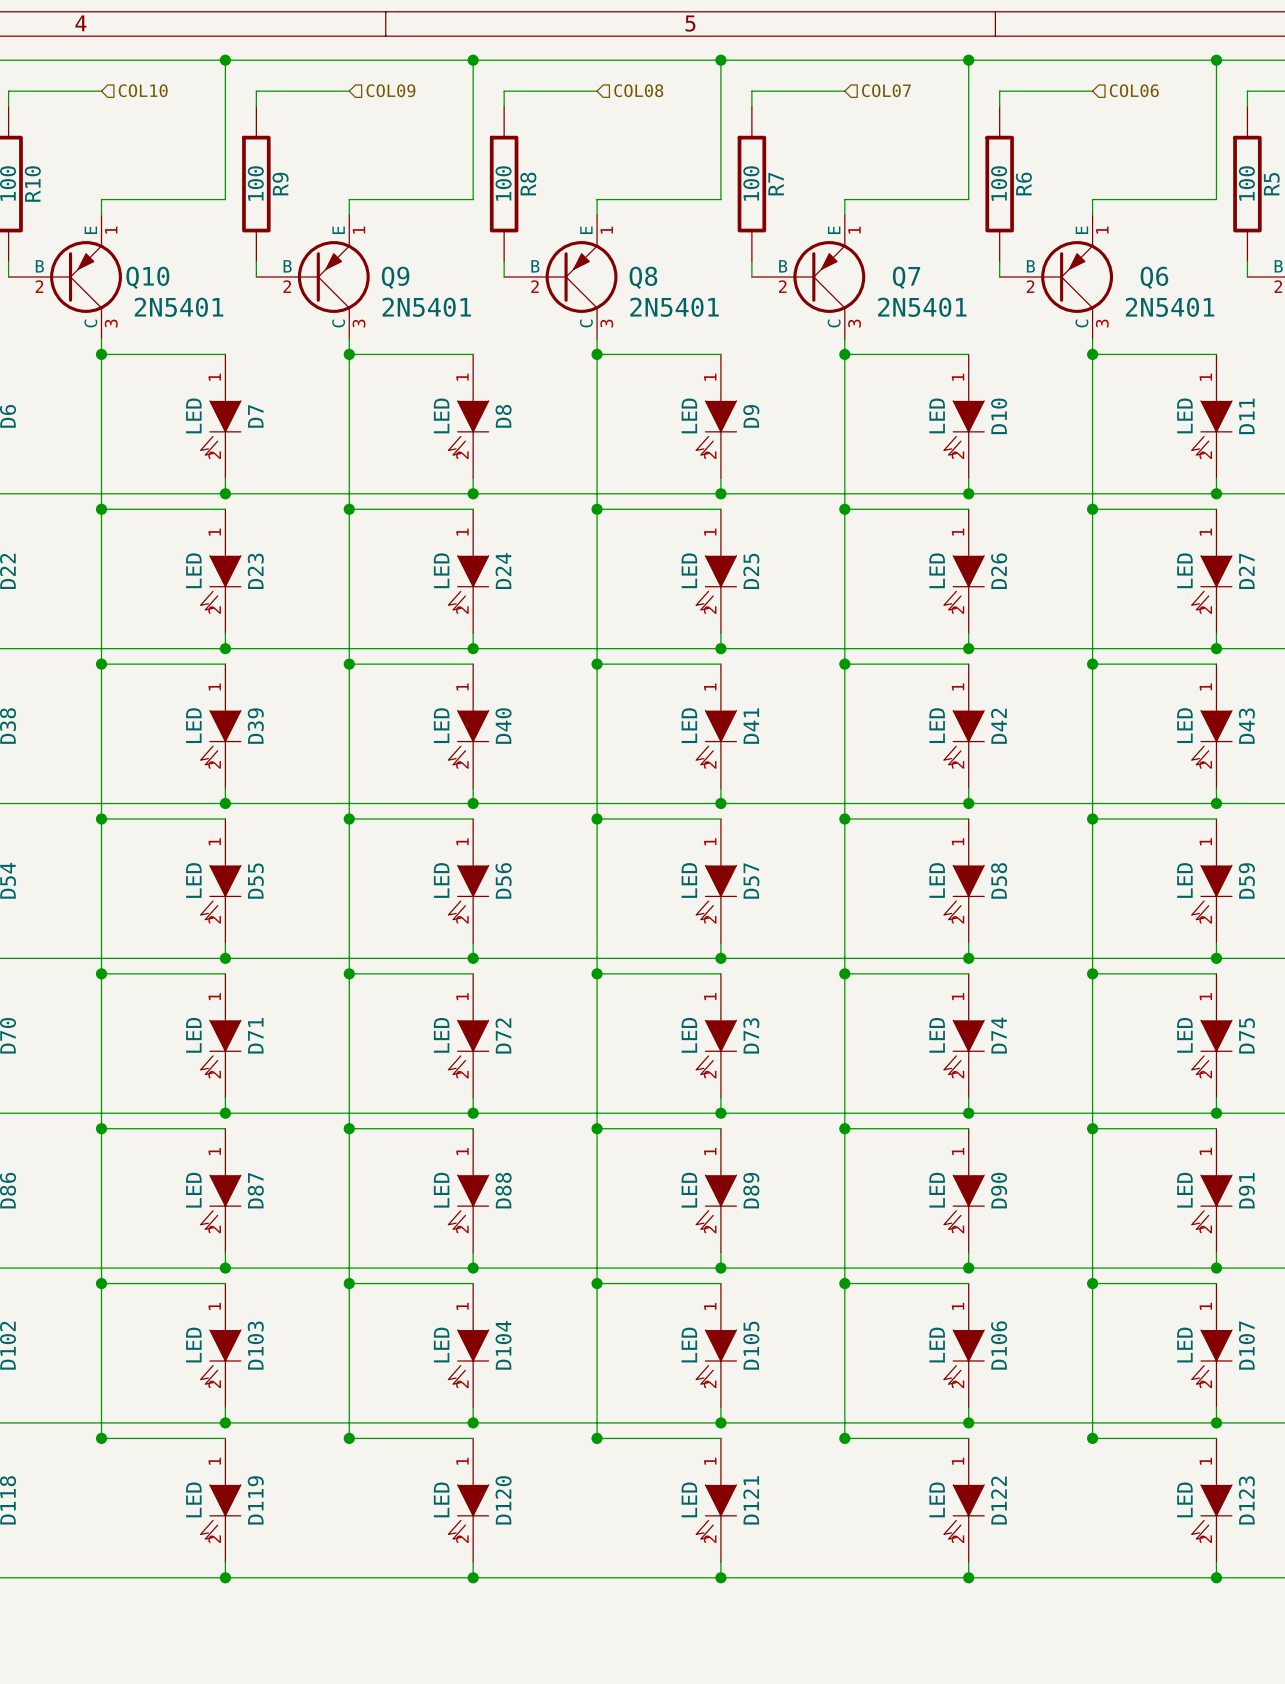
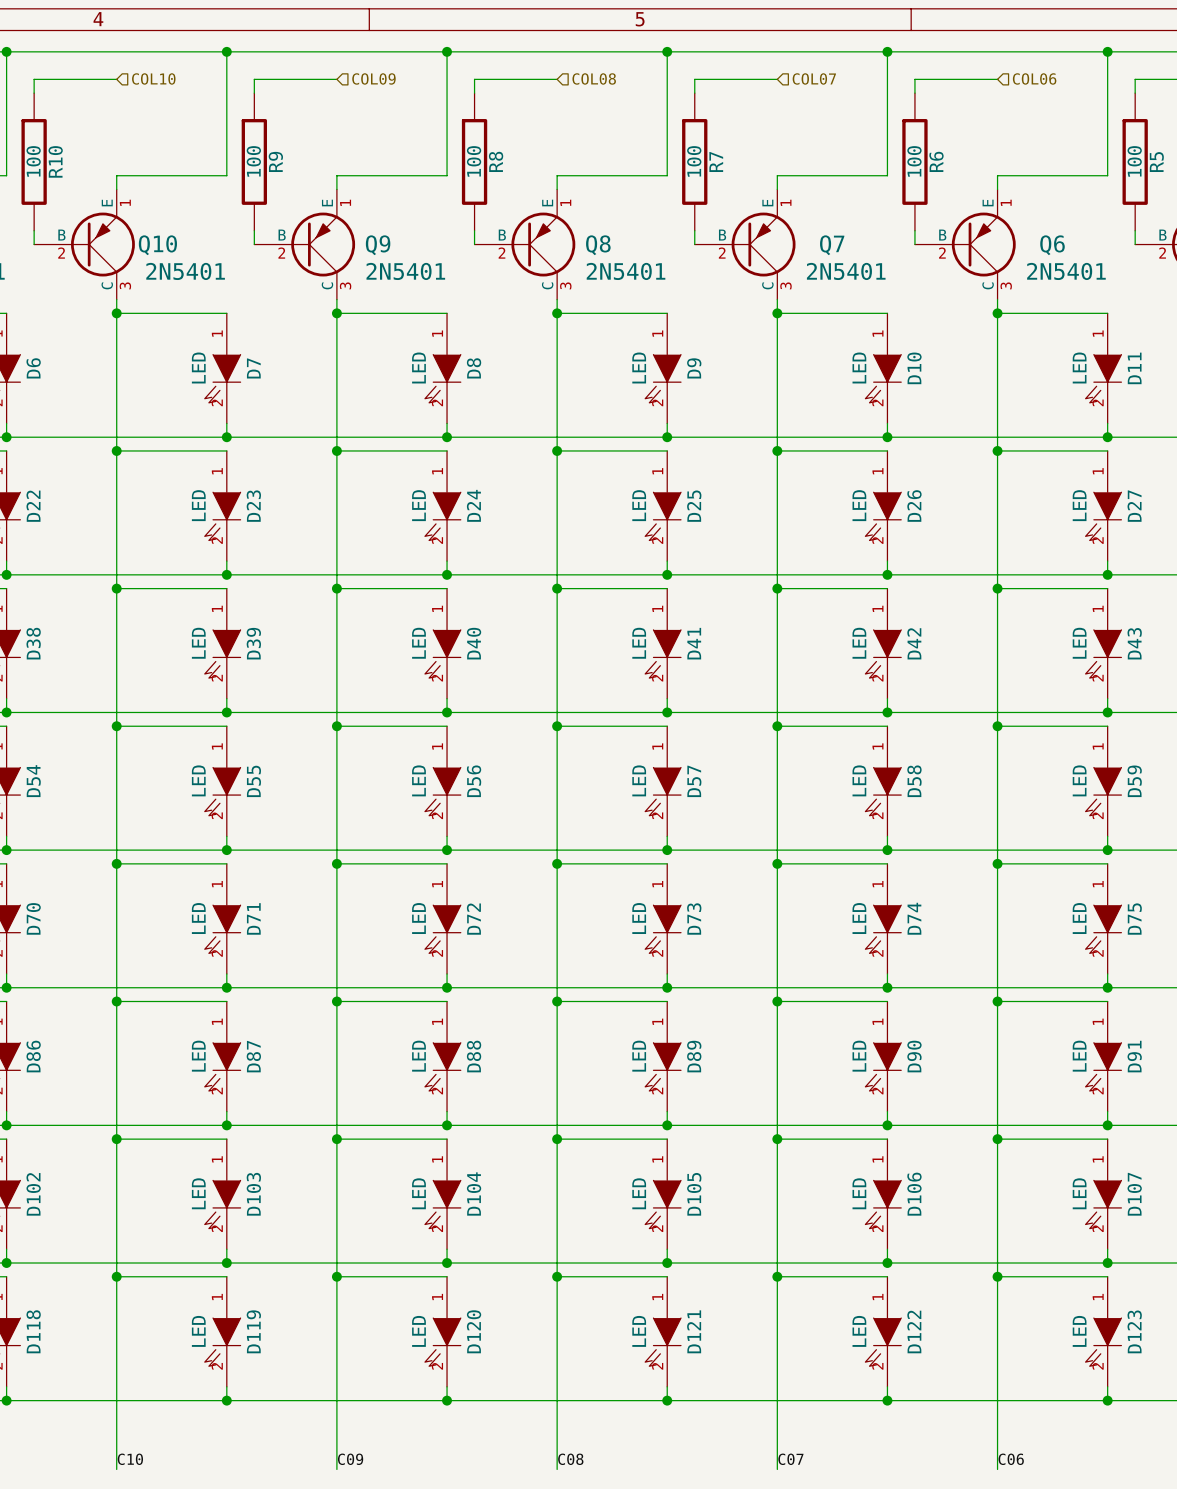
wire: none -> (116, 1276) (116, 1469)
wire: none -> (336, 1276) (336, 1469)
wire: none -> (557, 1276) (557, 1469)
wire: none -> (777, 1276) (777, 1469)
wire: none -> (997, 1276) (997, 1469)
label: none -> C10 (130, 1459)
label: none -> C09 (350, 1459)
label: none -> C08 (570, 1459)
label: none -> C07 (790, 1459)
label: none -> C06 (1011, 1459)

